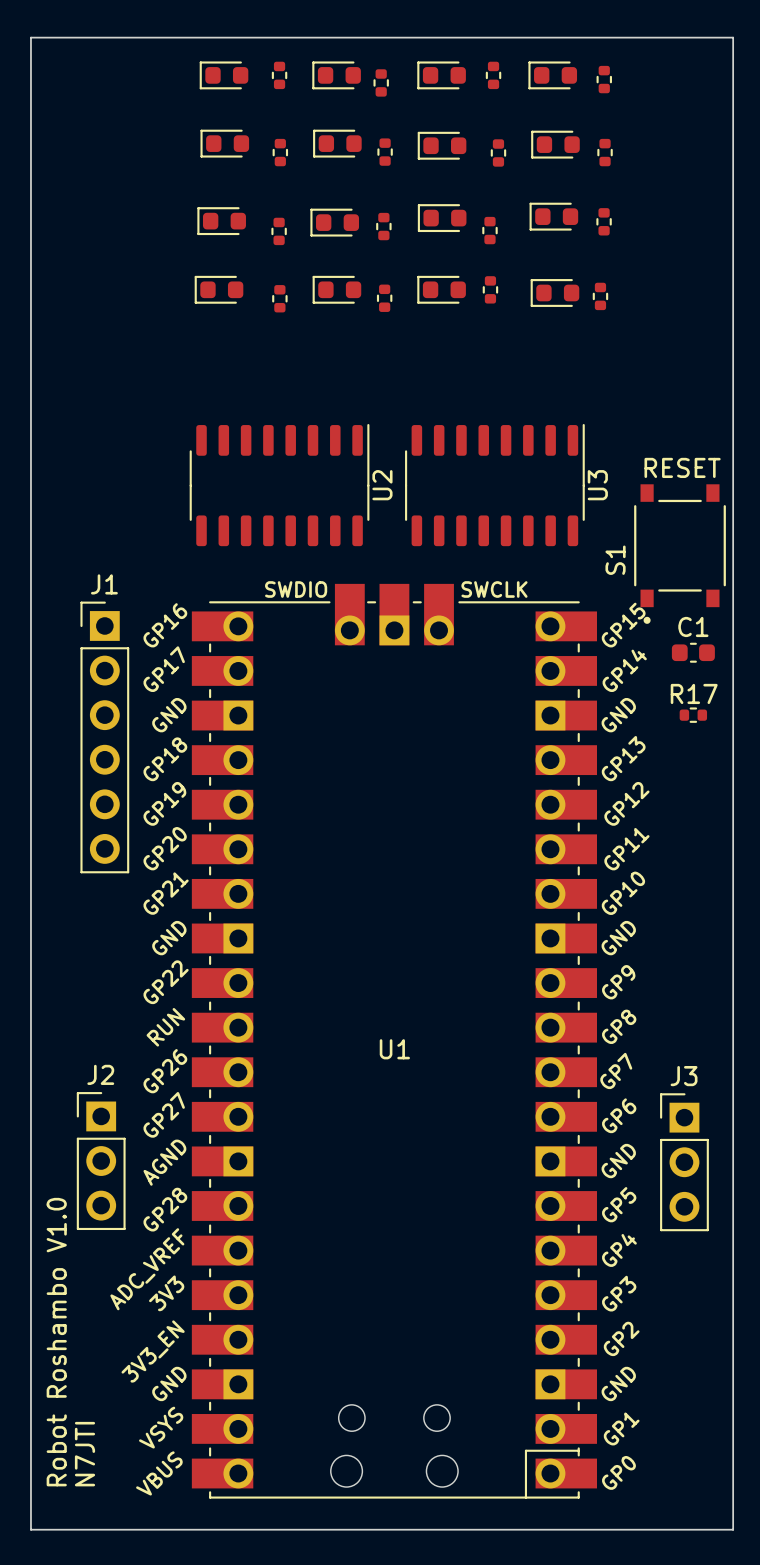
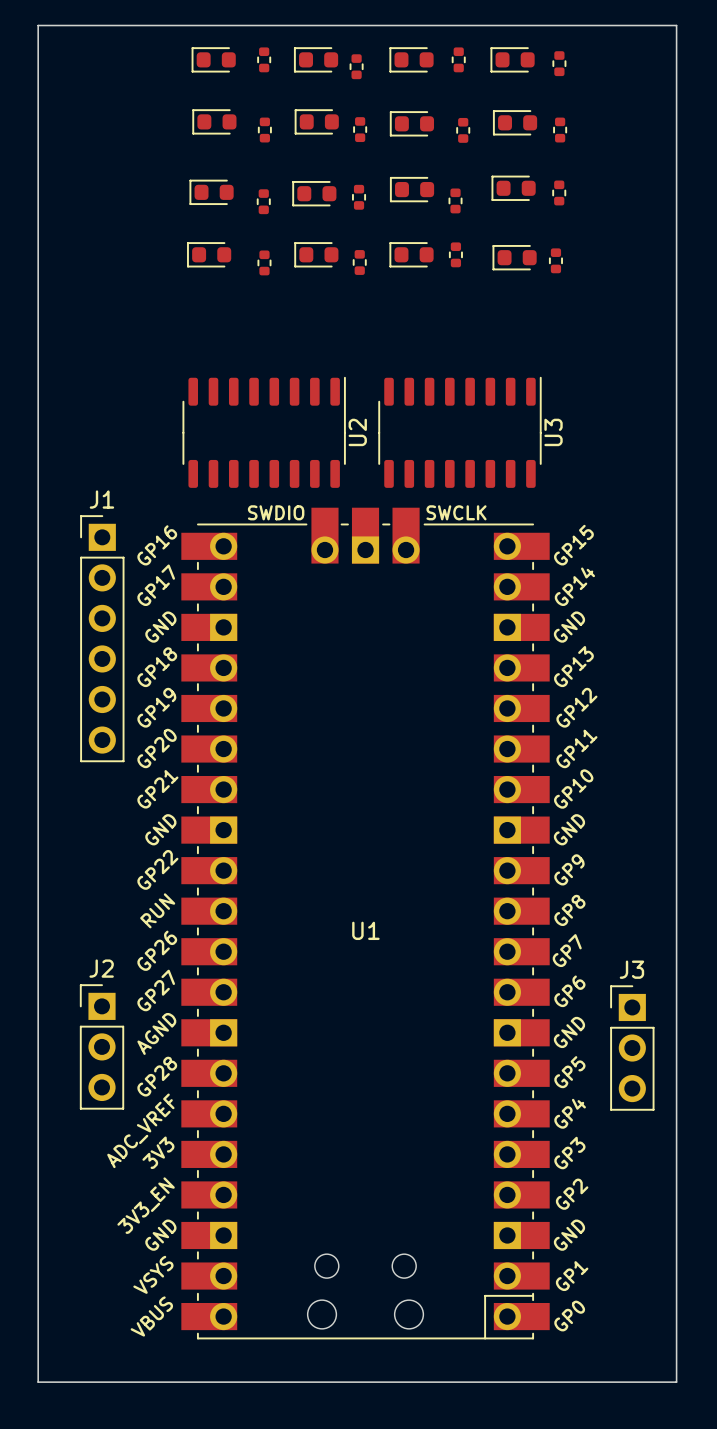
text: RESET (682, 467) -> none
S1: (680, 554) -> none
C1: (693, 652) -> none
R17: (693, 715) -> none
J1 position: (104, 737) -> (102, 638)
U1 position: (394, 1041) -> (365, 923)
text: Robot Roshambo V1.0 (56, 1342) -> none
text: N7JTI (84, 1454) -> none

